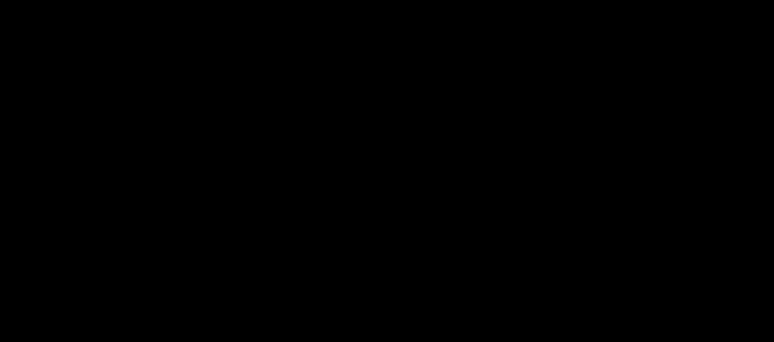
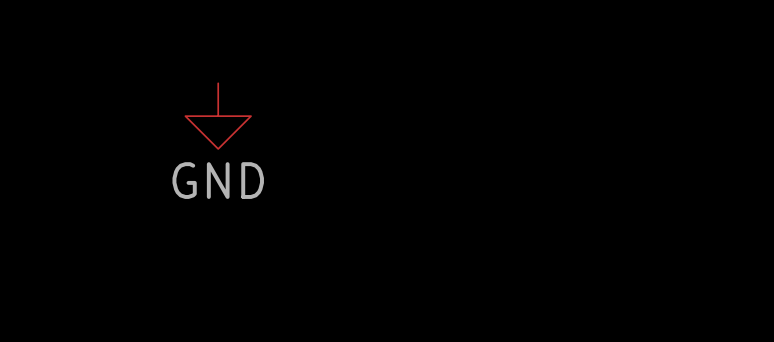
power symbol: none -> GND (218, 116)

